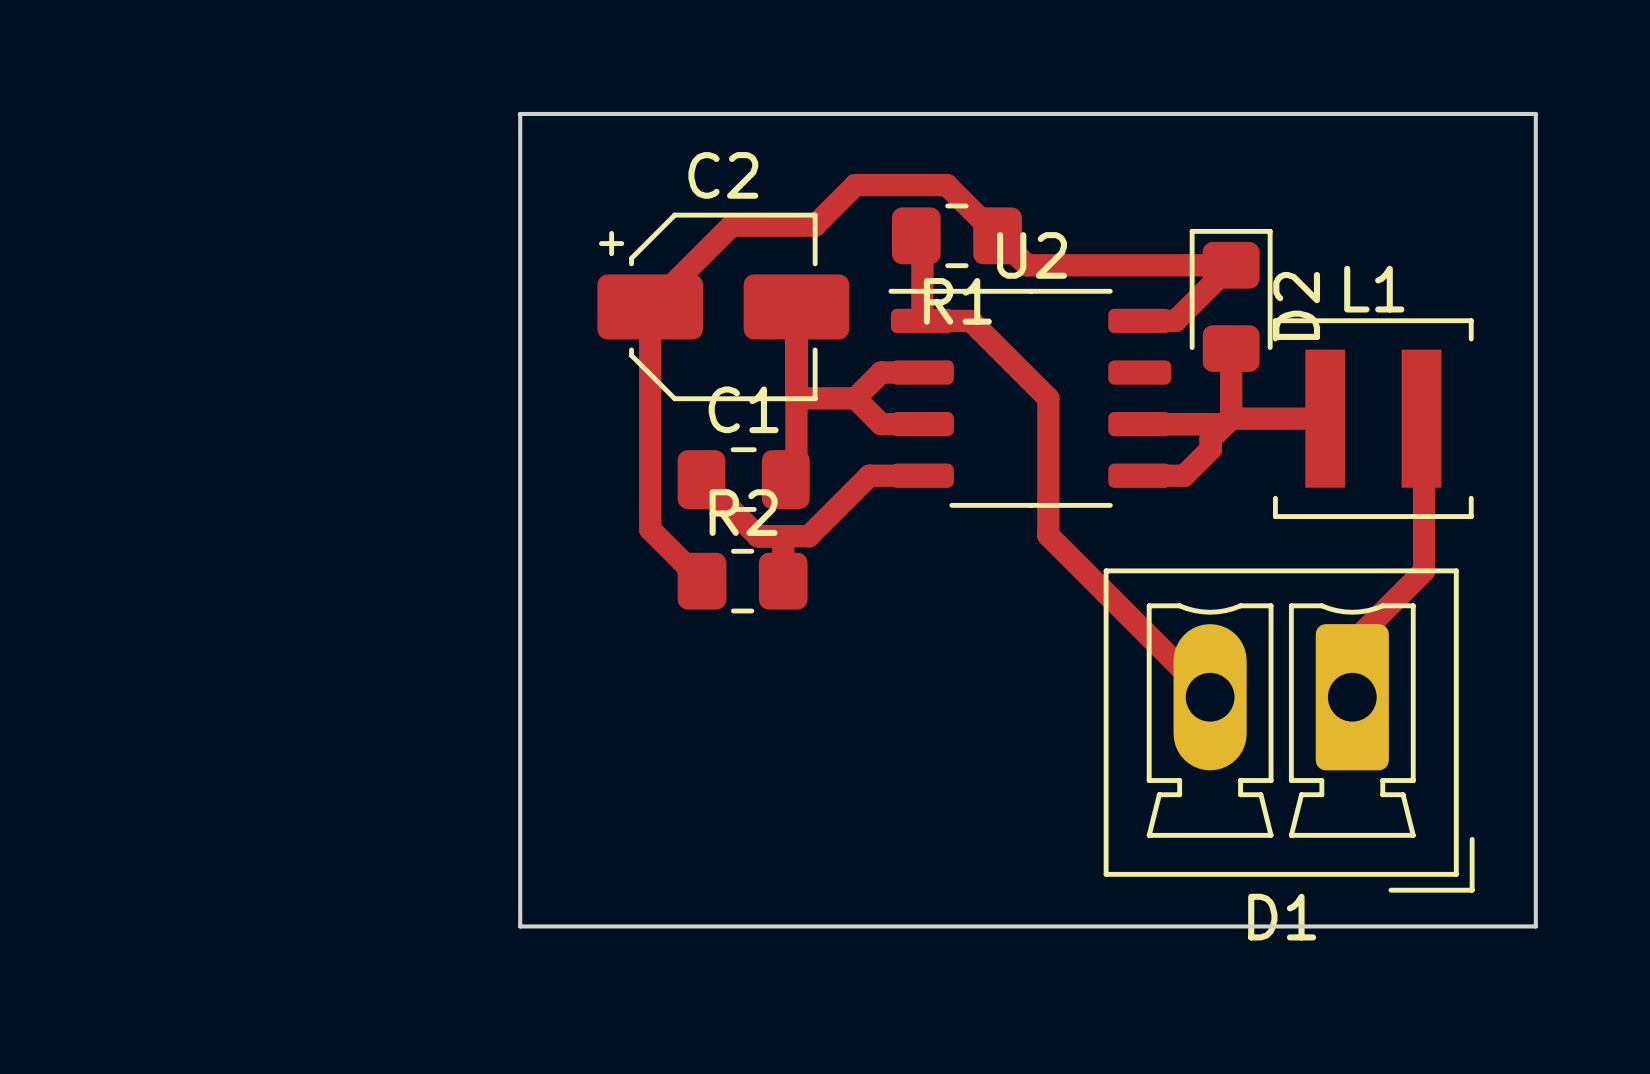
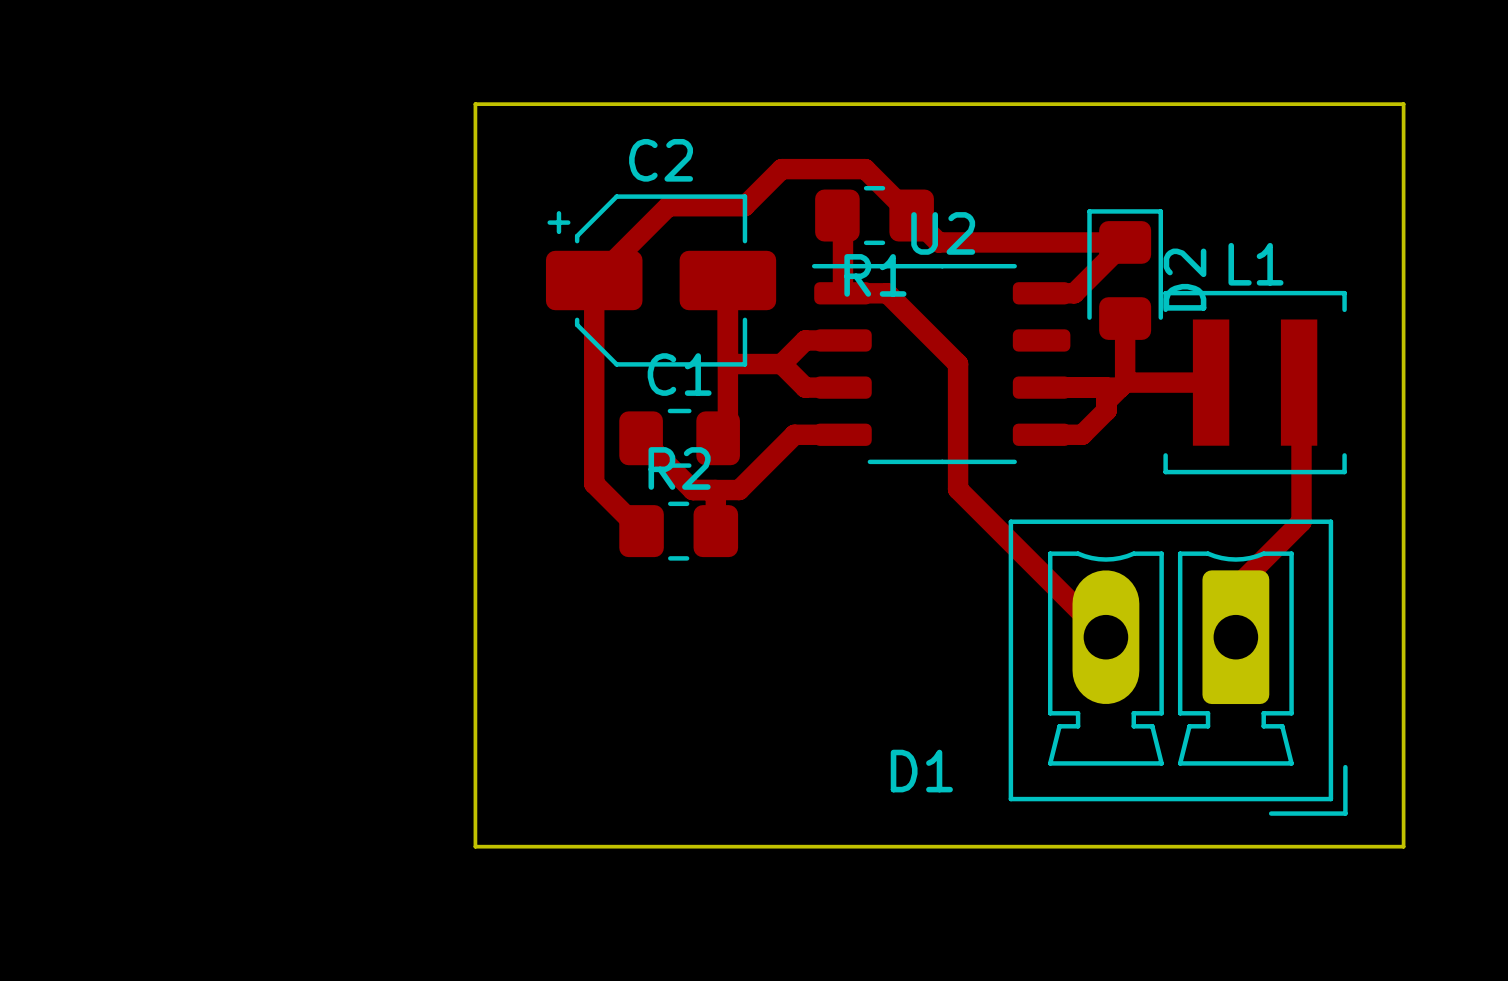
D1 name position: D1 (1282, 917) -> D1 (921, 771)

